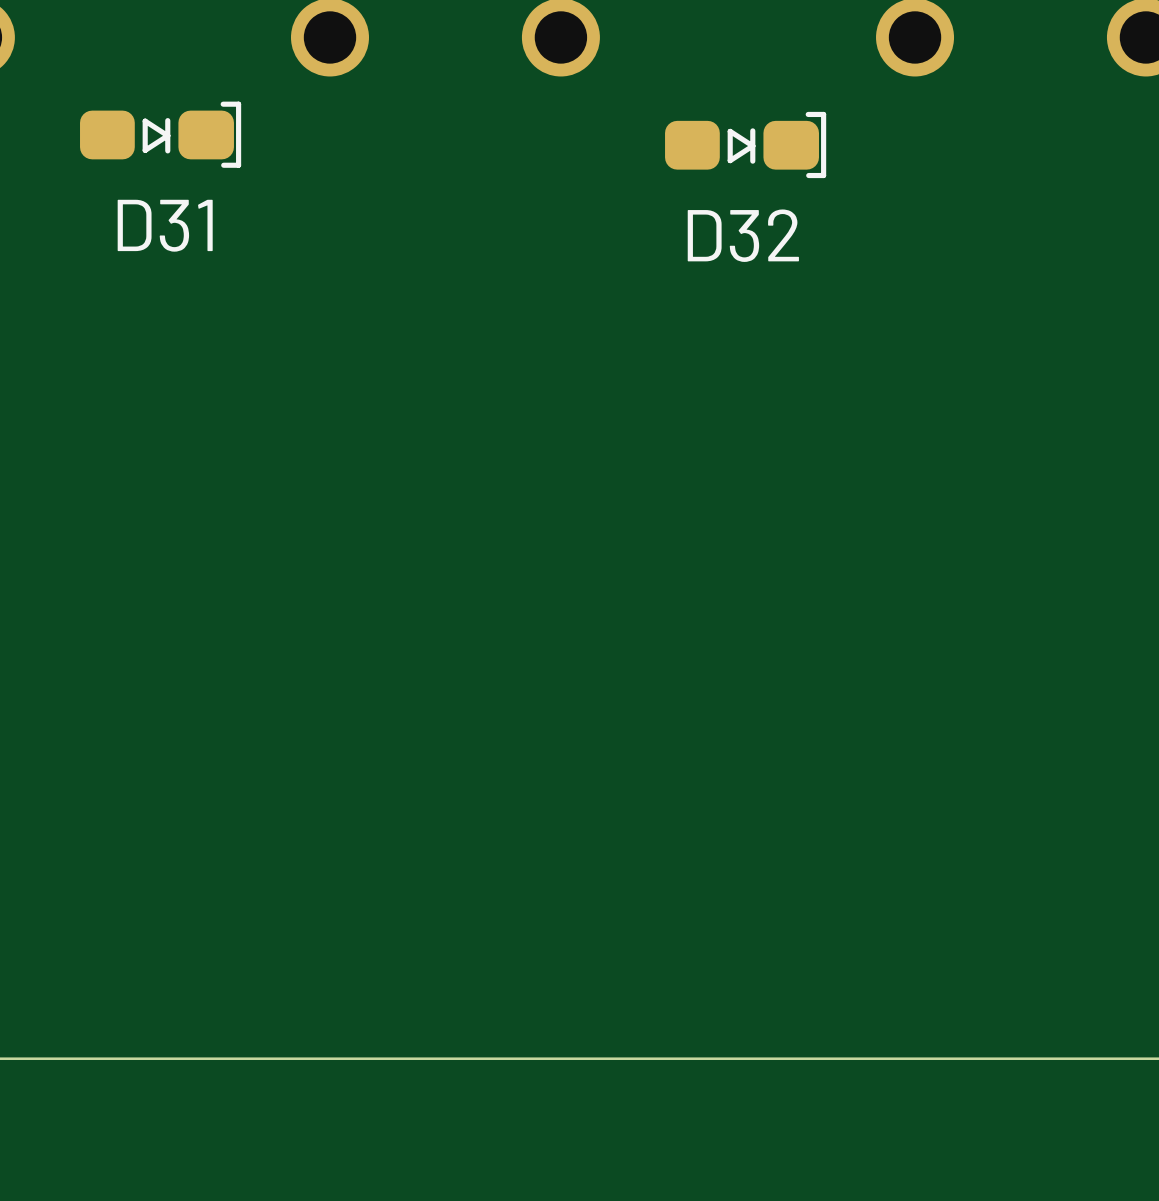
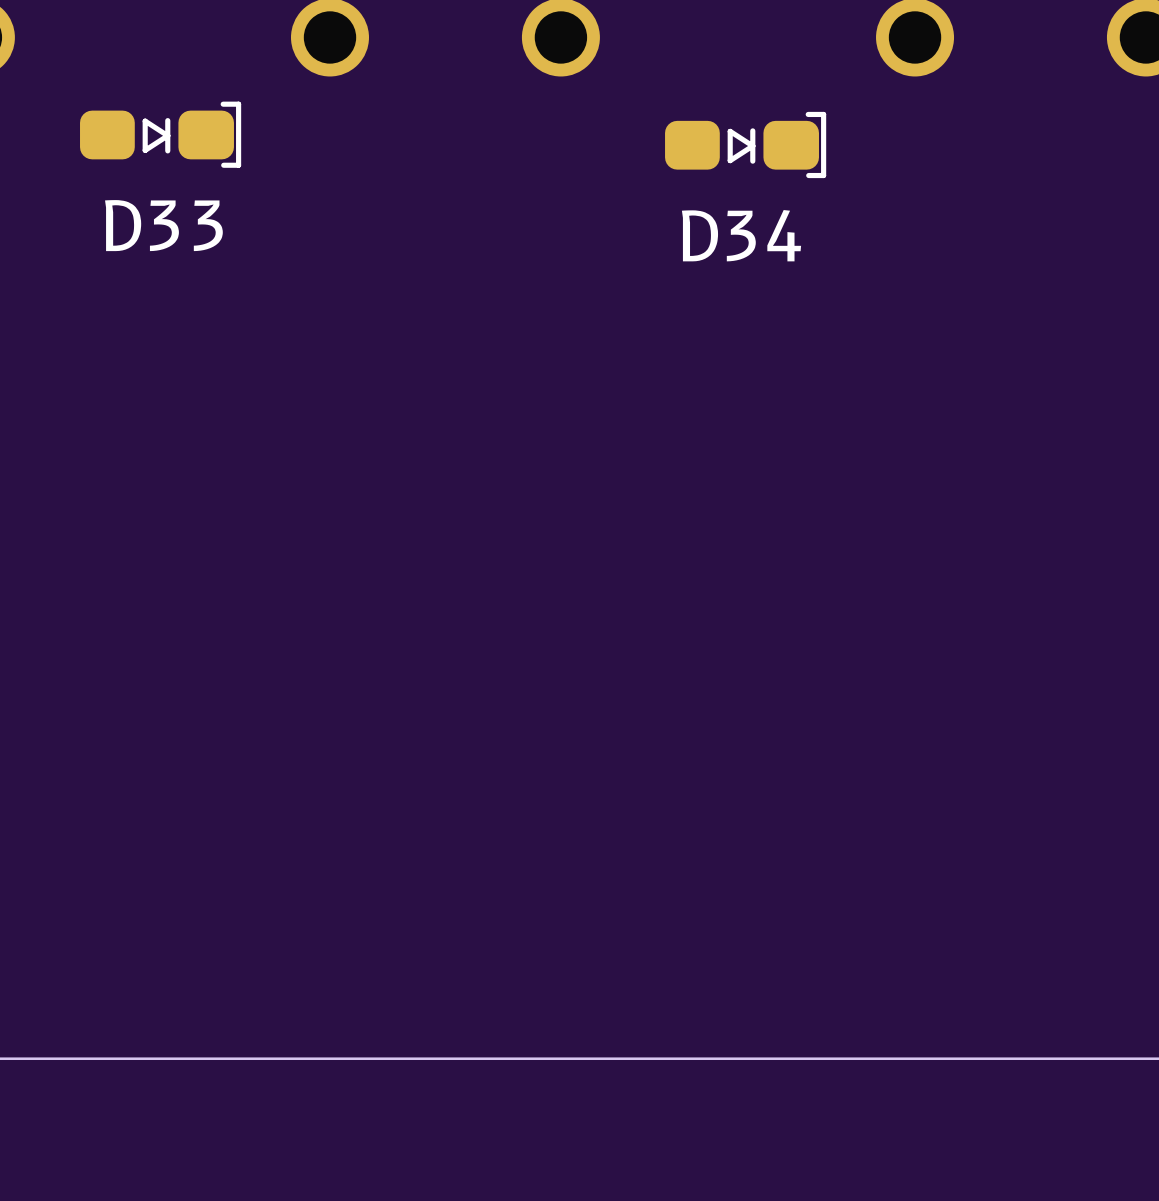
D31 name: D31 (165, 225) -> D33 (163, 225)
D32 name: D32 (743, 235) -> D34 (741, 235)

